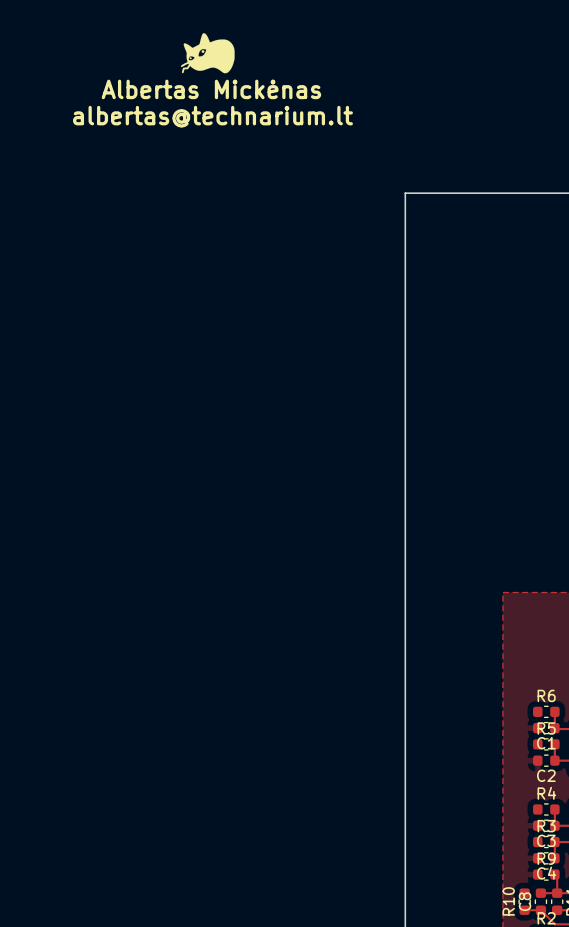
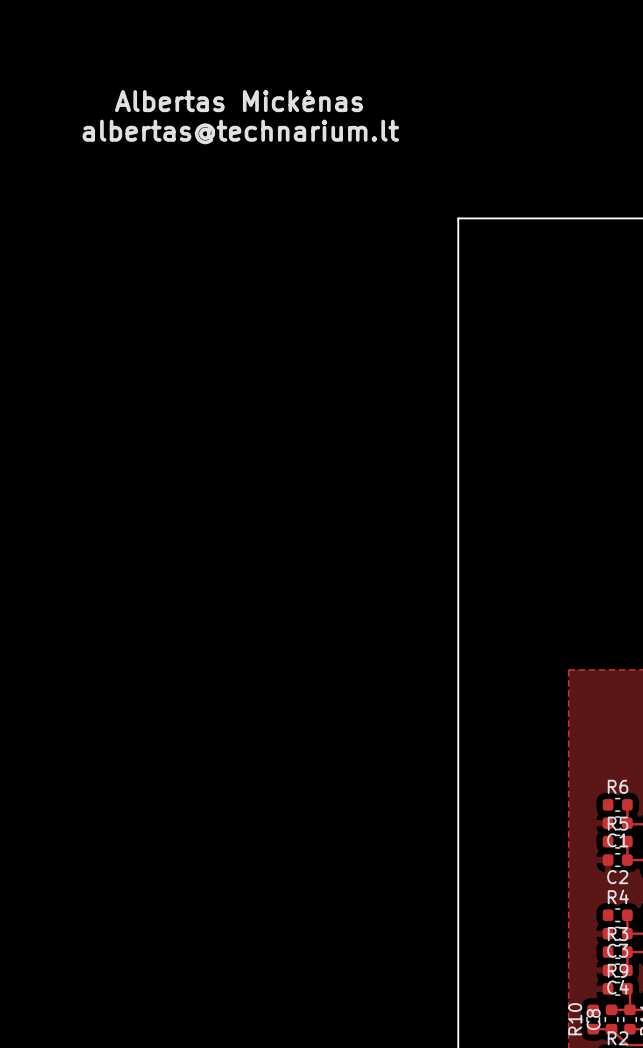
drawing: [180, 33, 235, 74] -> none

